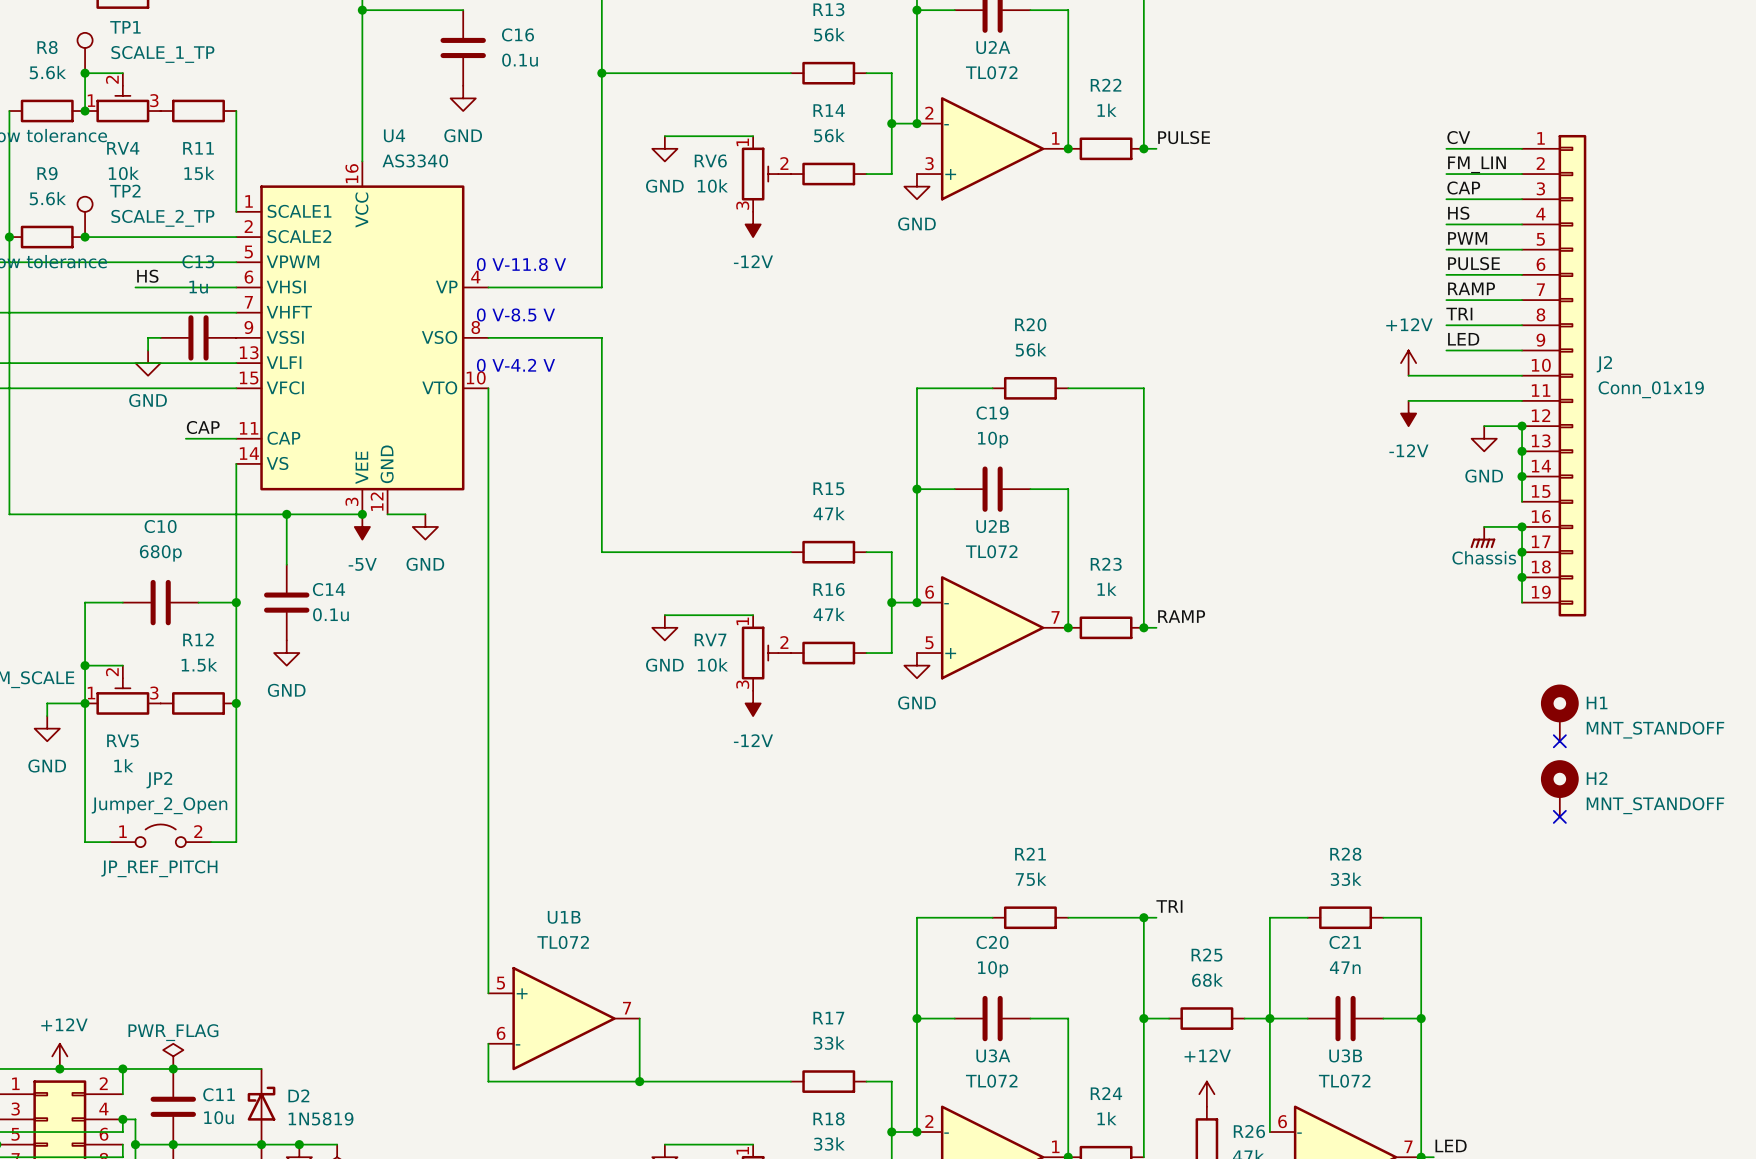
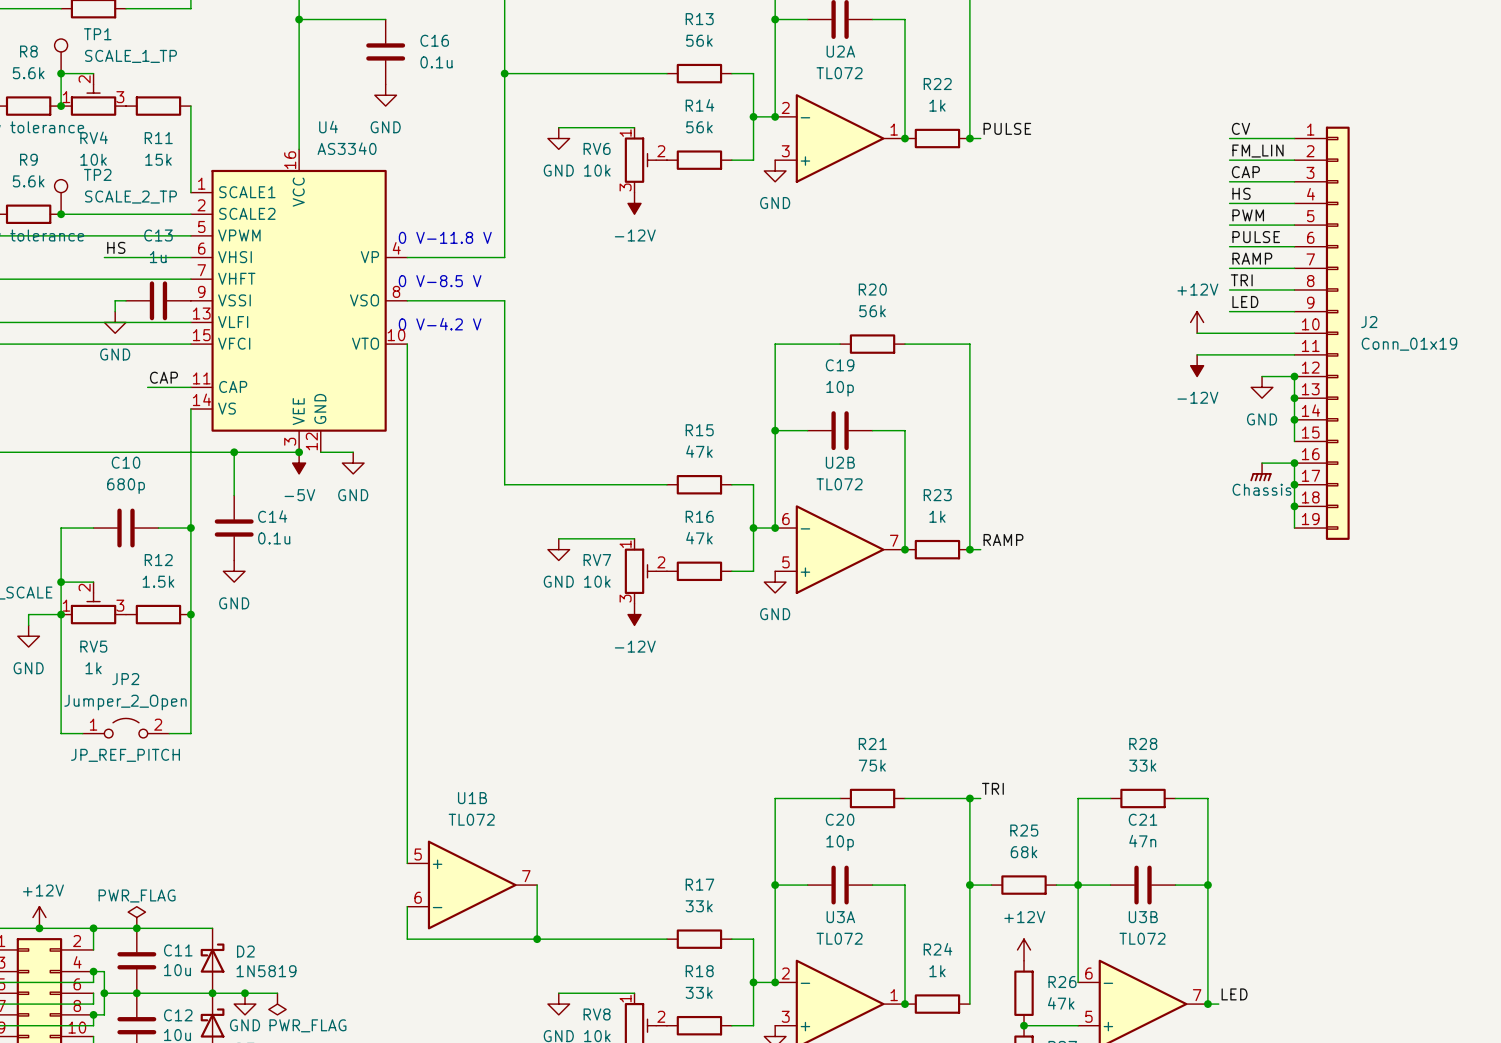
H1: MNT_STANDOFF (1559, 712) -> none
no-connect mark: (1559, 741) -> none
H2: MNT_STANDOFF (1559, 788) -> none
no-connect mark: (1559, 816) -> none

